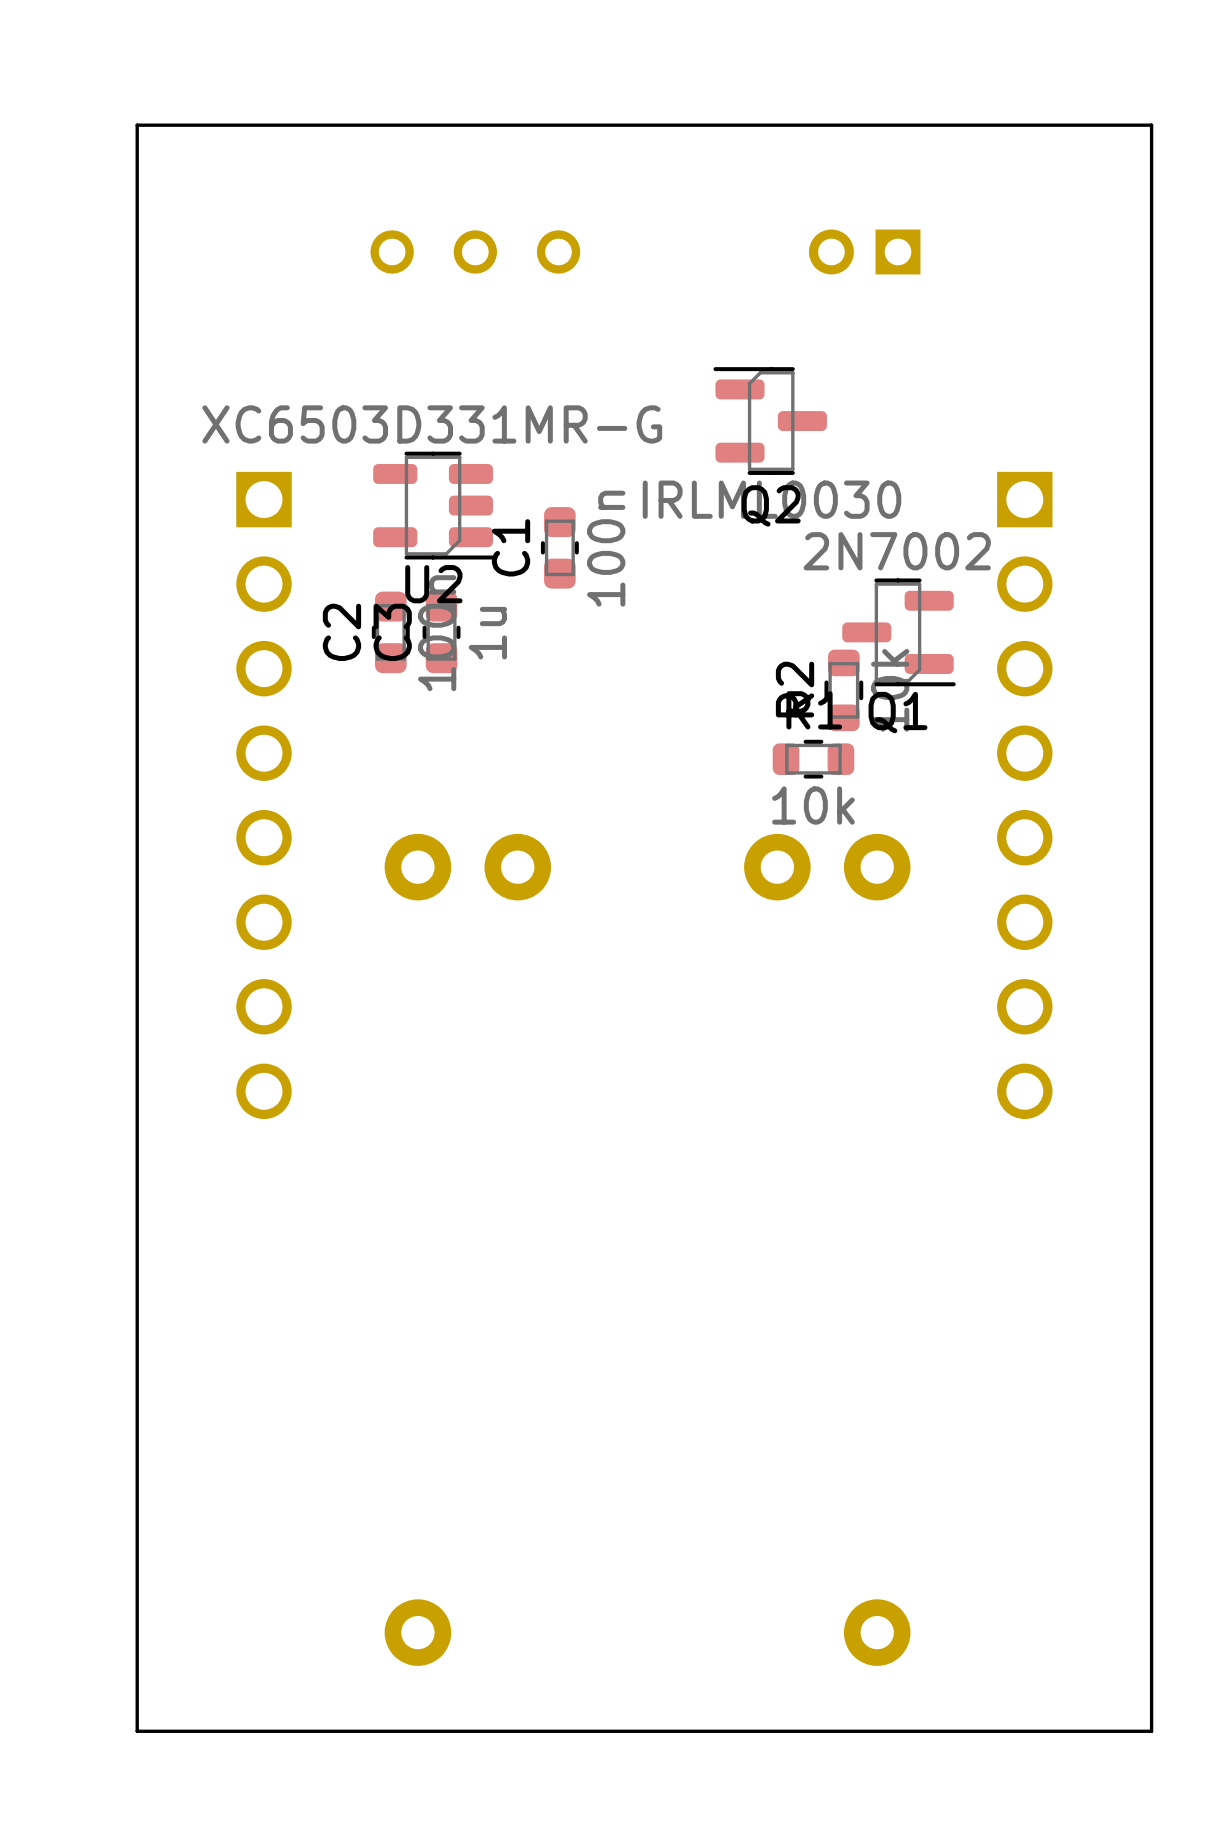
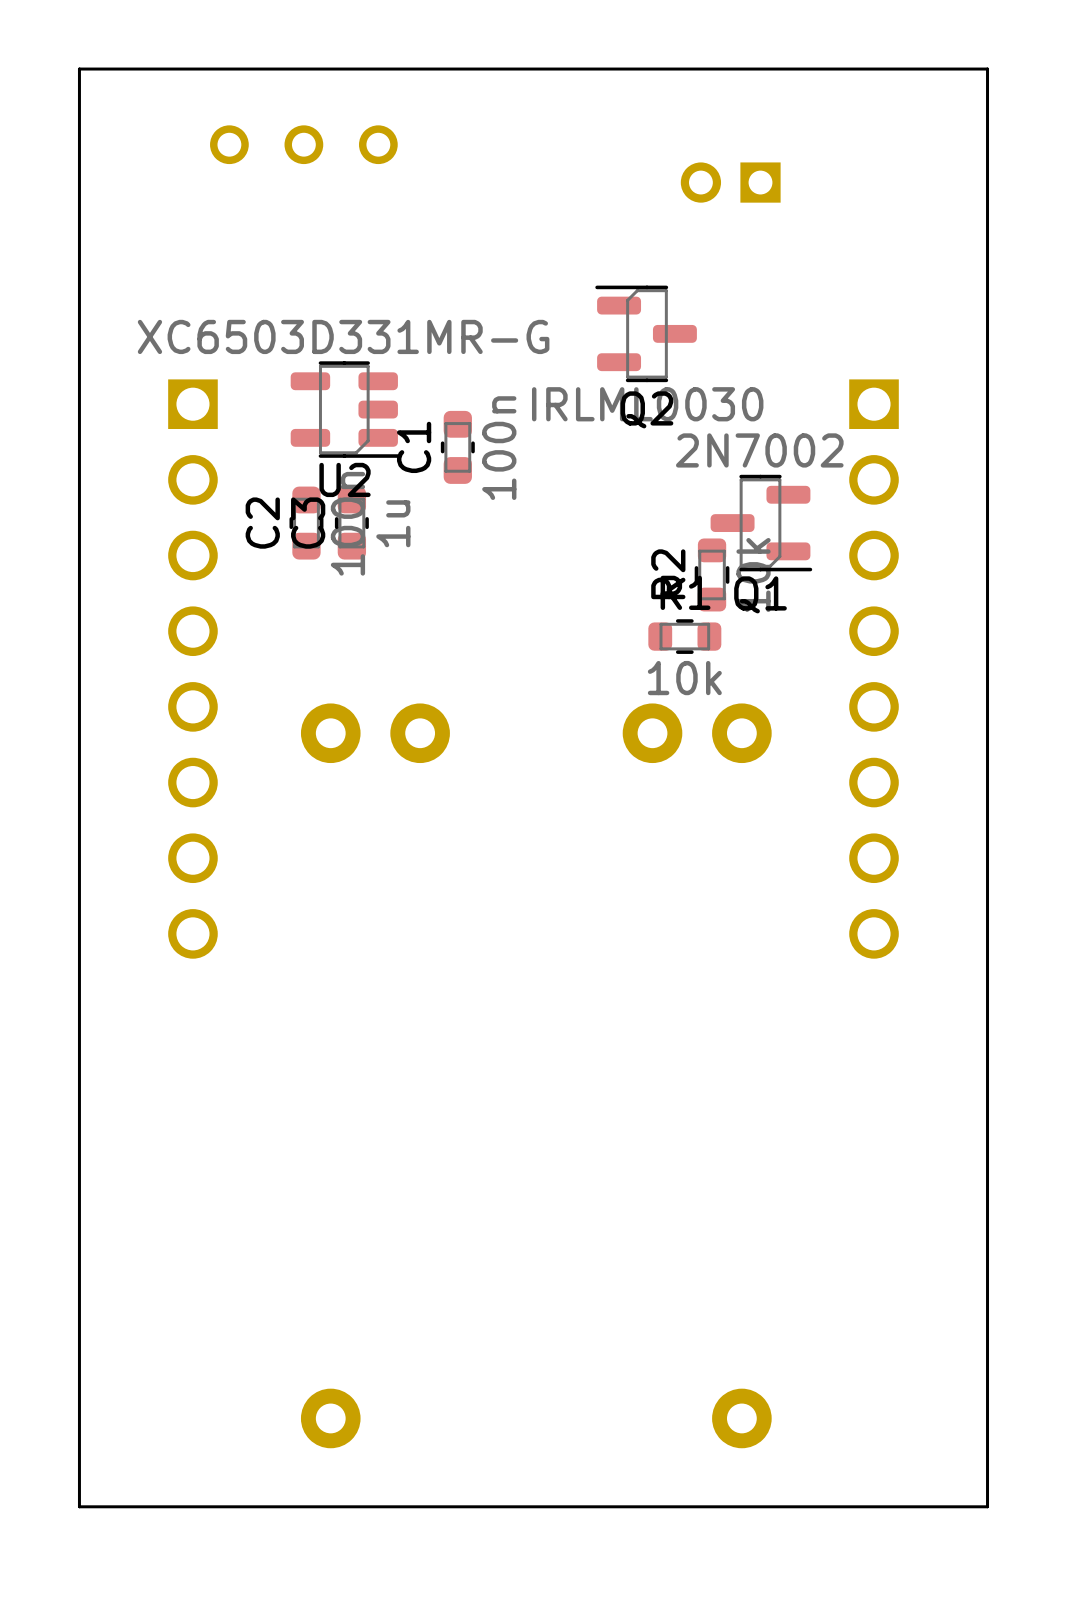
part position: (475, 251) -> (303, 144)

